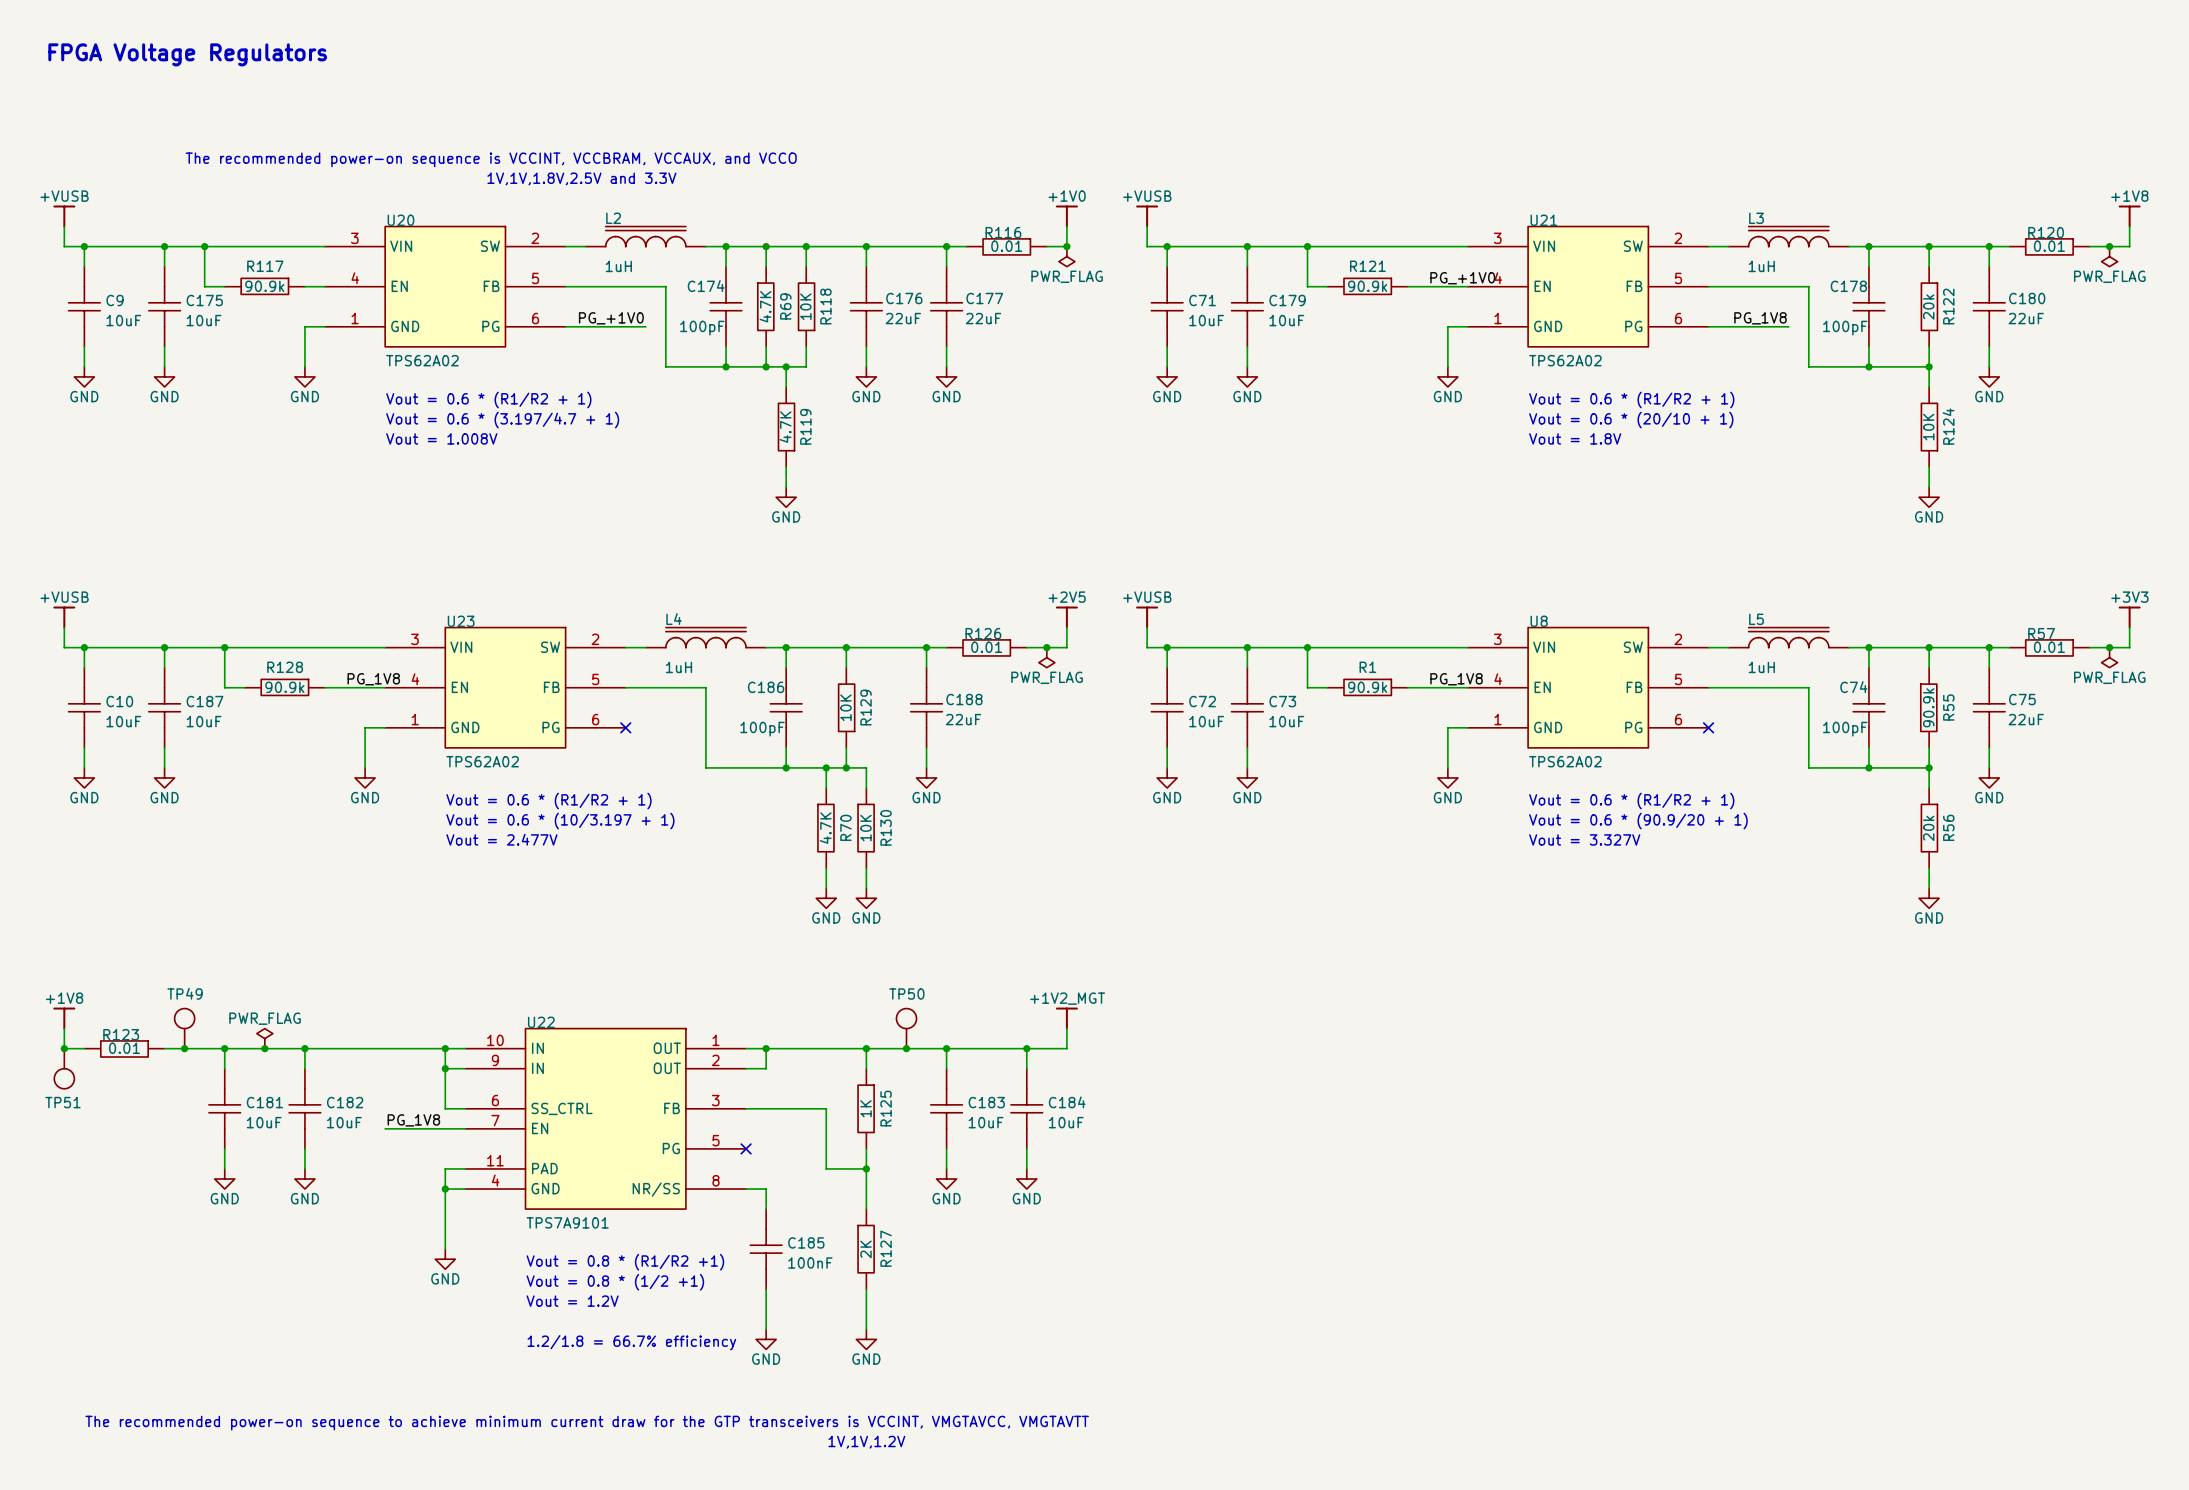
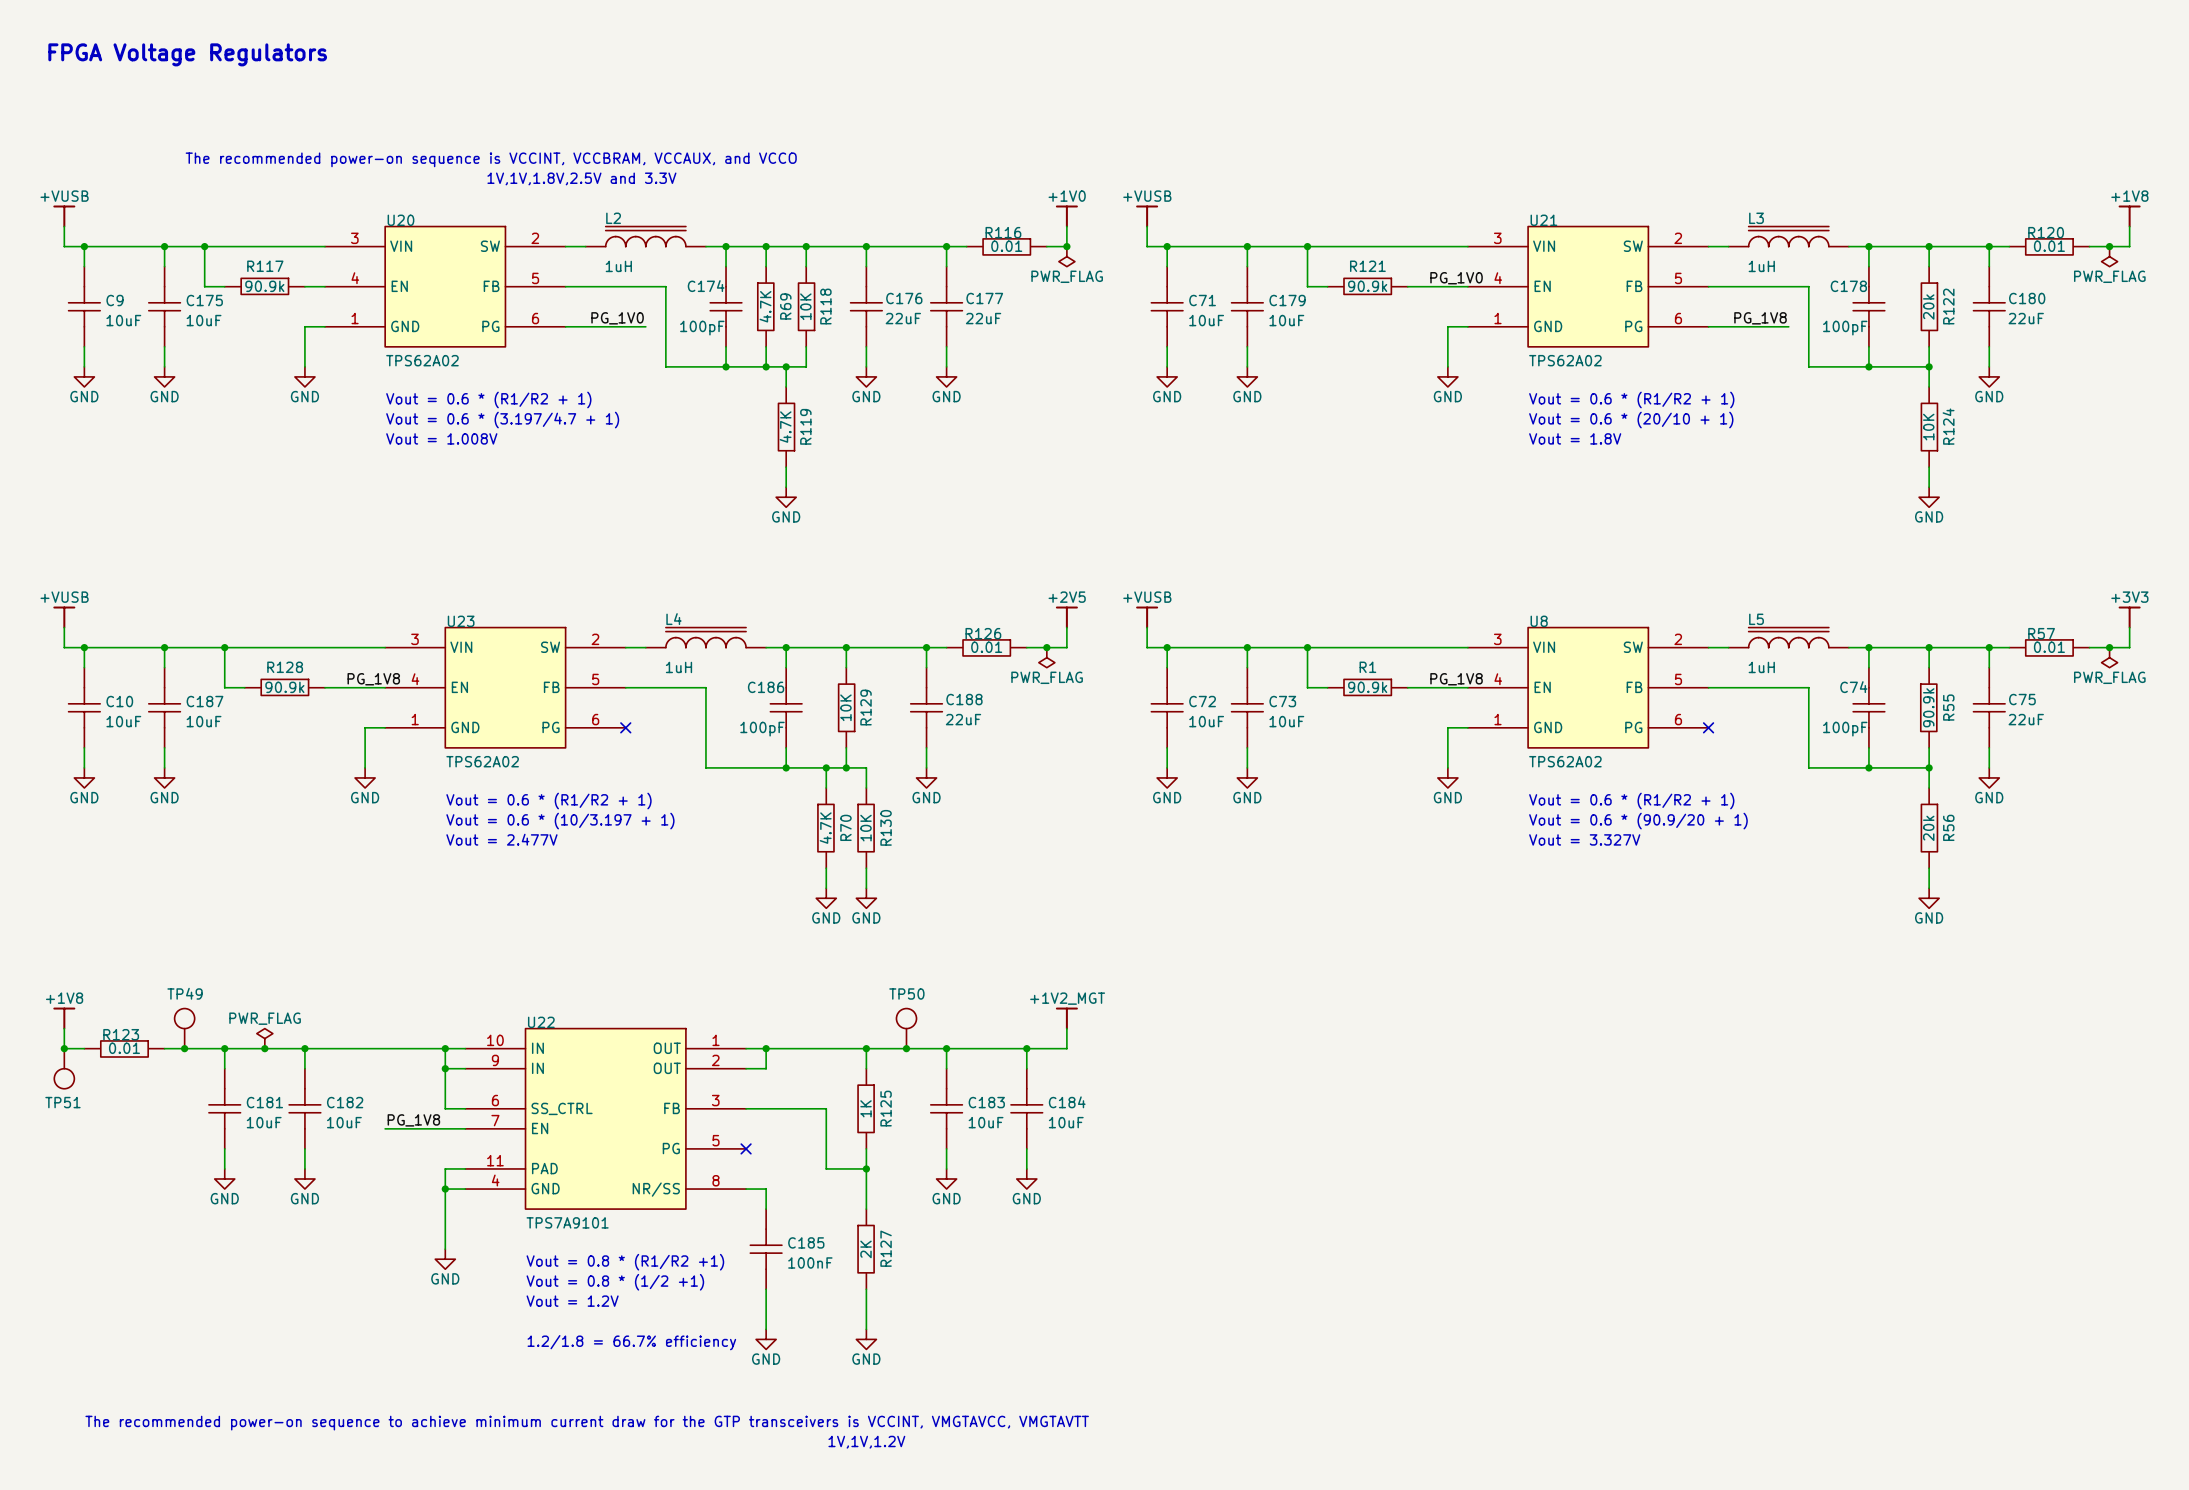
label: PG_+1V0 (1462, 278) -> PG_1V0 (1456, 278)
label: PG_+1V0 (611, 318) -> PG_1V0 (617, 318)

